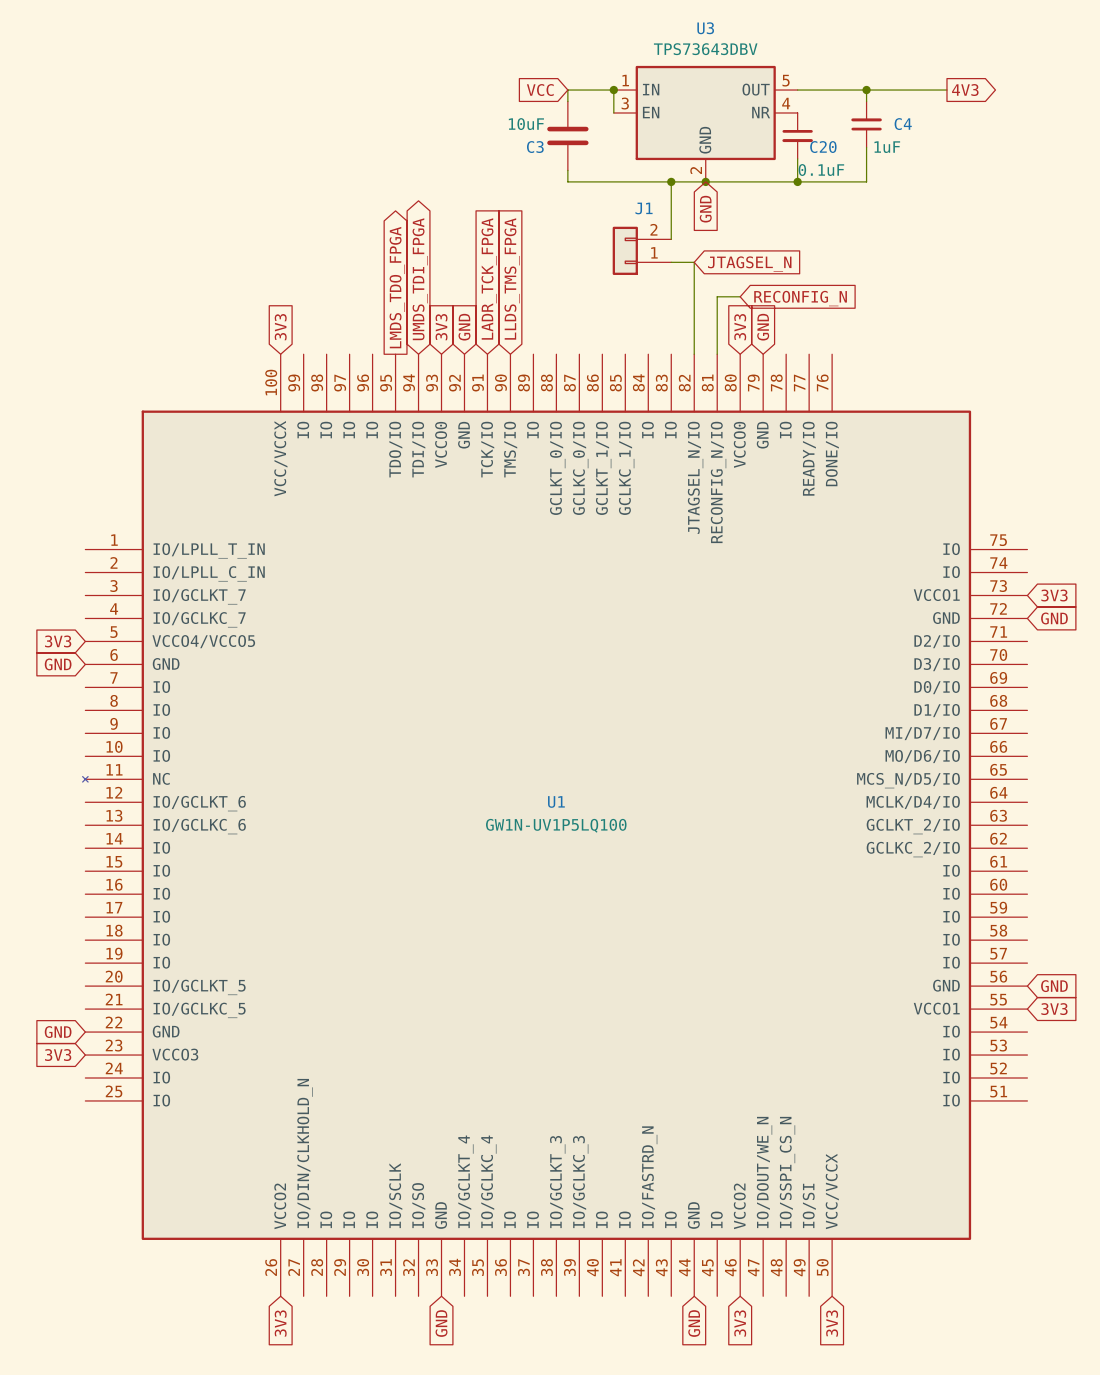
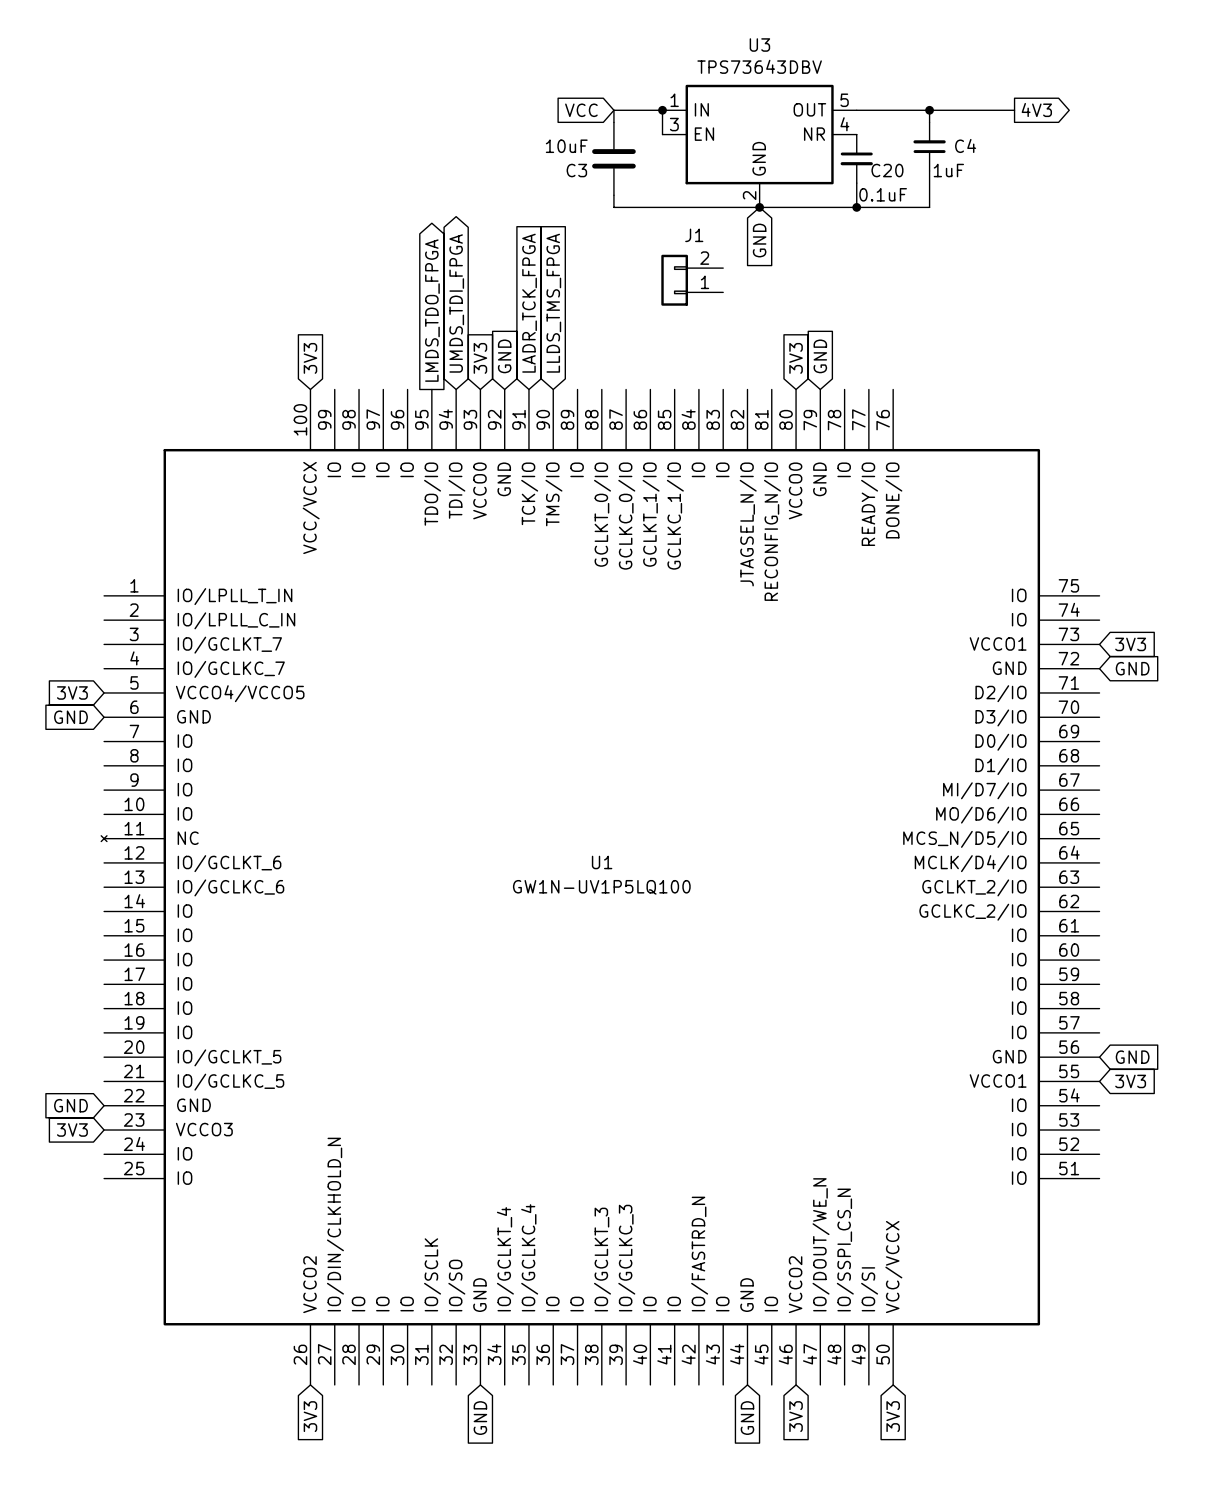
wire: (671, 181) (671, 239) -> none
junction: (671, 181) -> none
wire: (671, 262) (694, 262) (694, 354) -> none
global label: JTAGSEL_N (749, 264) -> none
wire: (740, 296) (717, 296) (717, 354) -> none
global label: RECONFIG_N (800, 298) -> none

